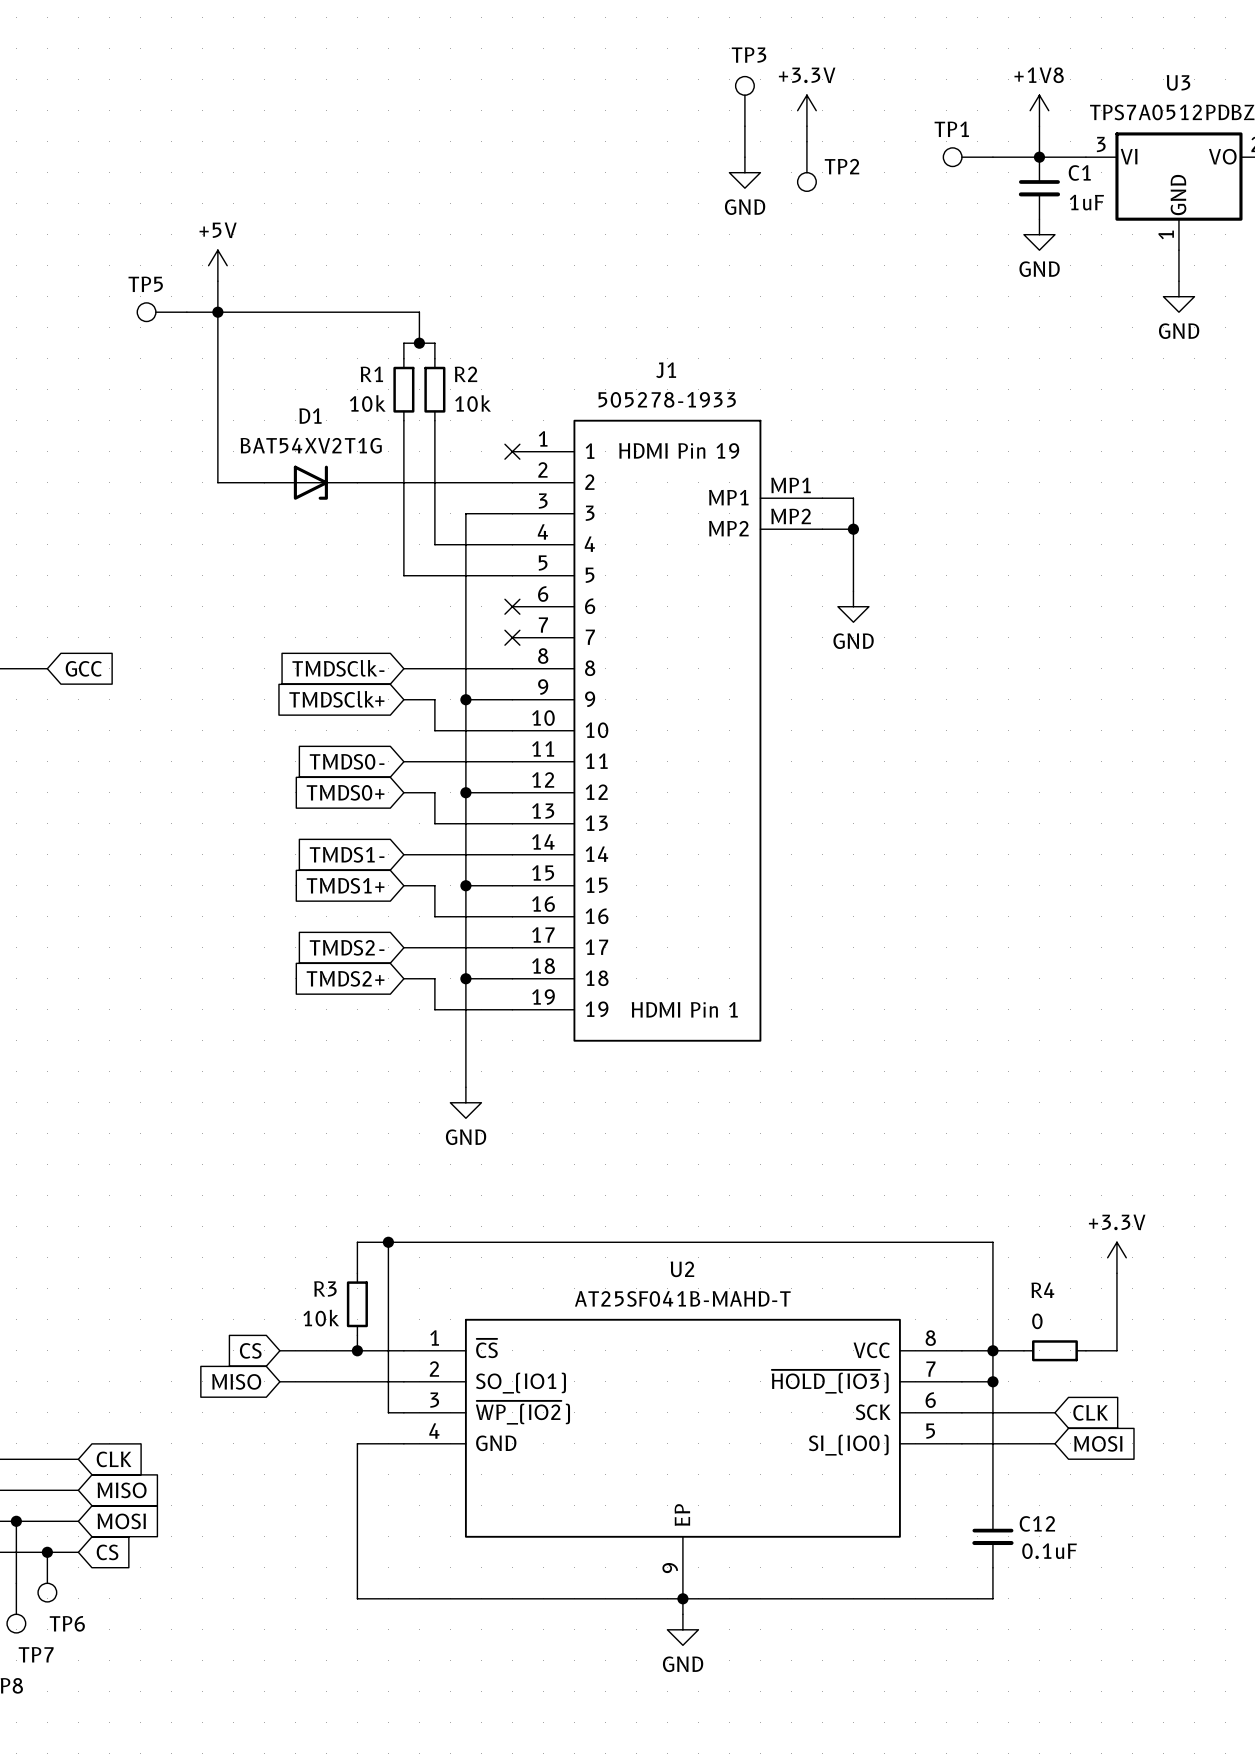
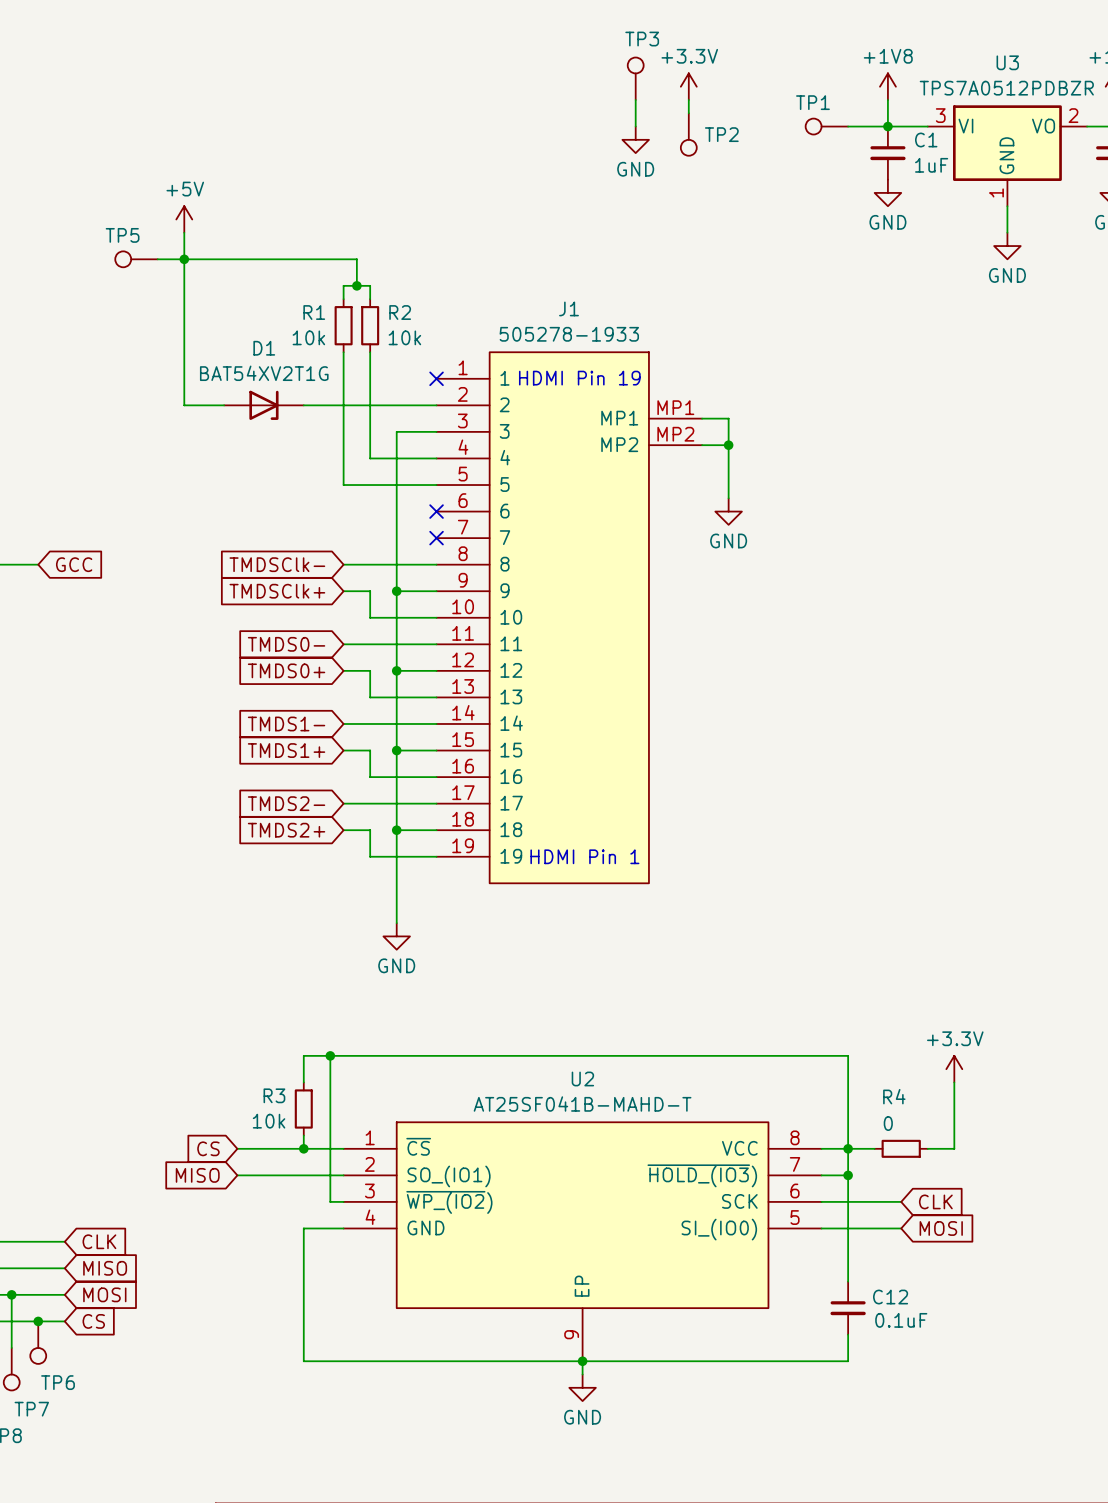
J1 symbol: [512, 419, 823, 1042] -> [436, 351, 703, 885]
U2 symbol: [403, 1318, 962, 1599] -> [343, 1121, 822, 1362]

